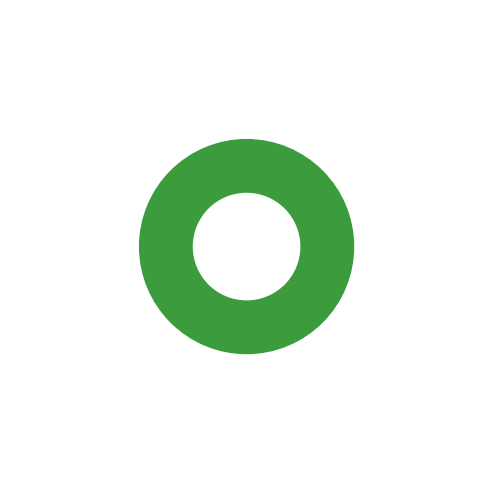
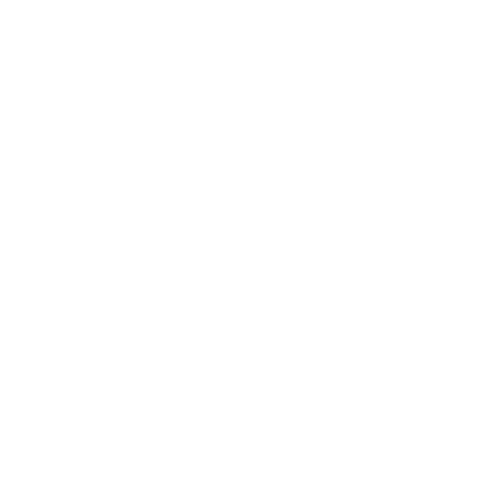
part: (246, 246) -> none

